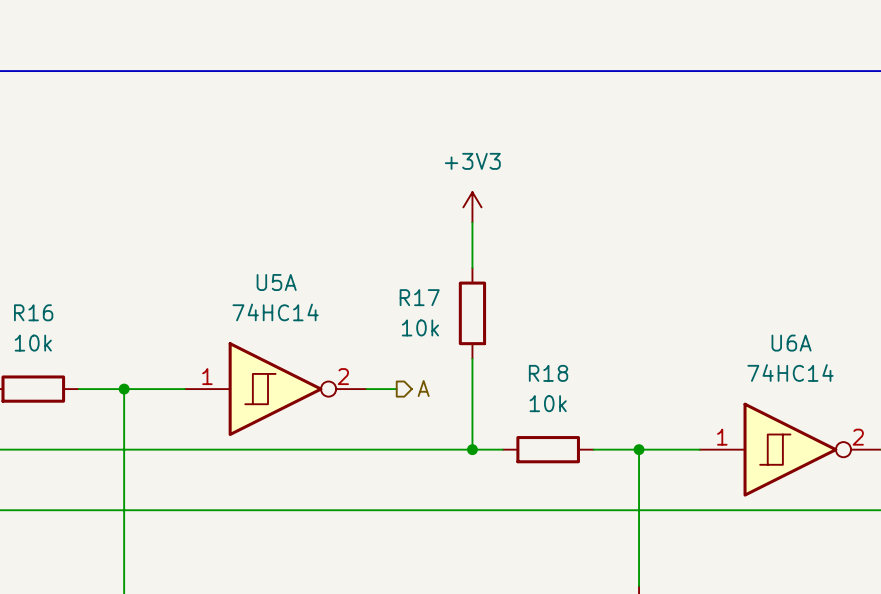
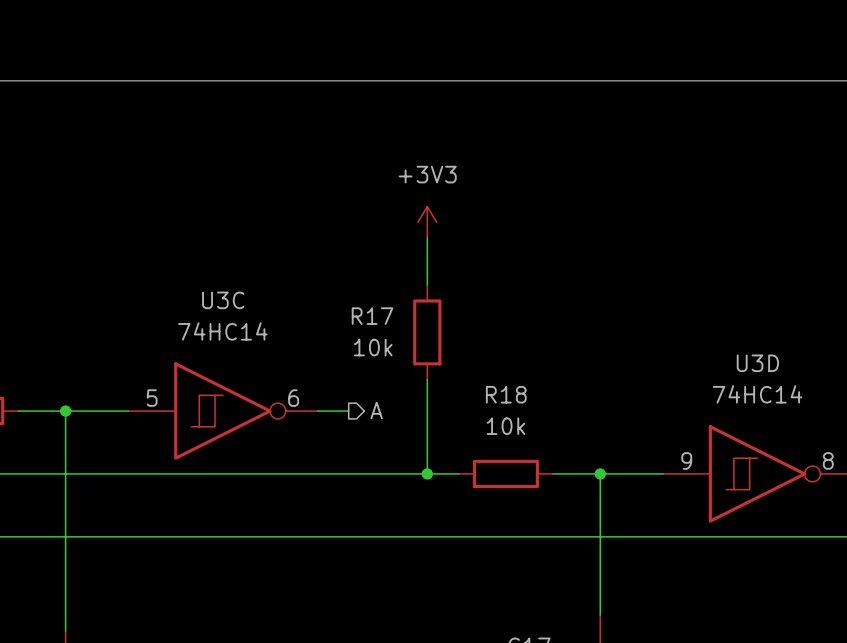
U5A name: U5A (276, 282) -> U3C (223, 300)
U6A name: U6A (791, 343) -> U3D (757, 363)
U5A pin number: 1 (207, 376) -> 5 (152, 398)
U5A pin number: 2 (343, 376) -> 6 (293, 398)
U6A pin number: 1 (722, 437) -> 9 (686, 460)
U6A pin number: 2 (858, 437) -> 8 (828, 460)

